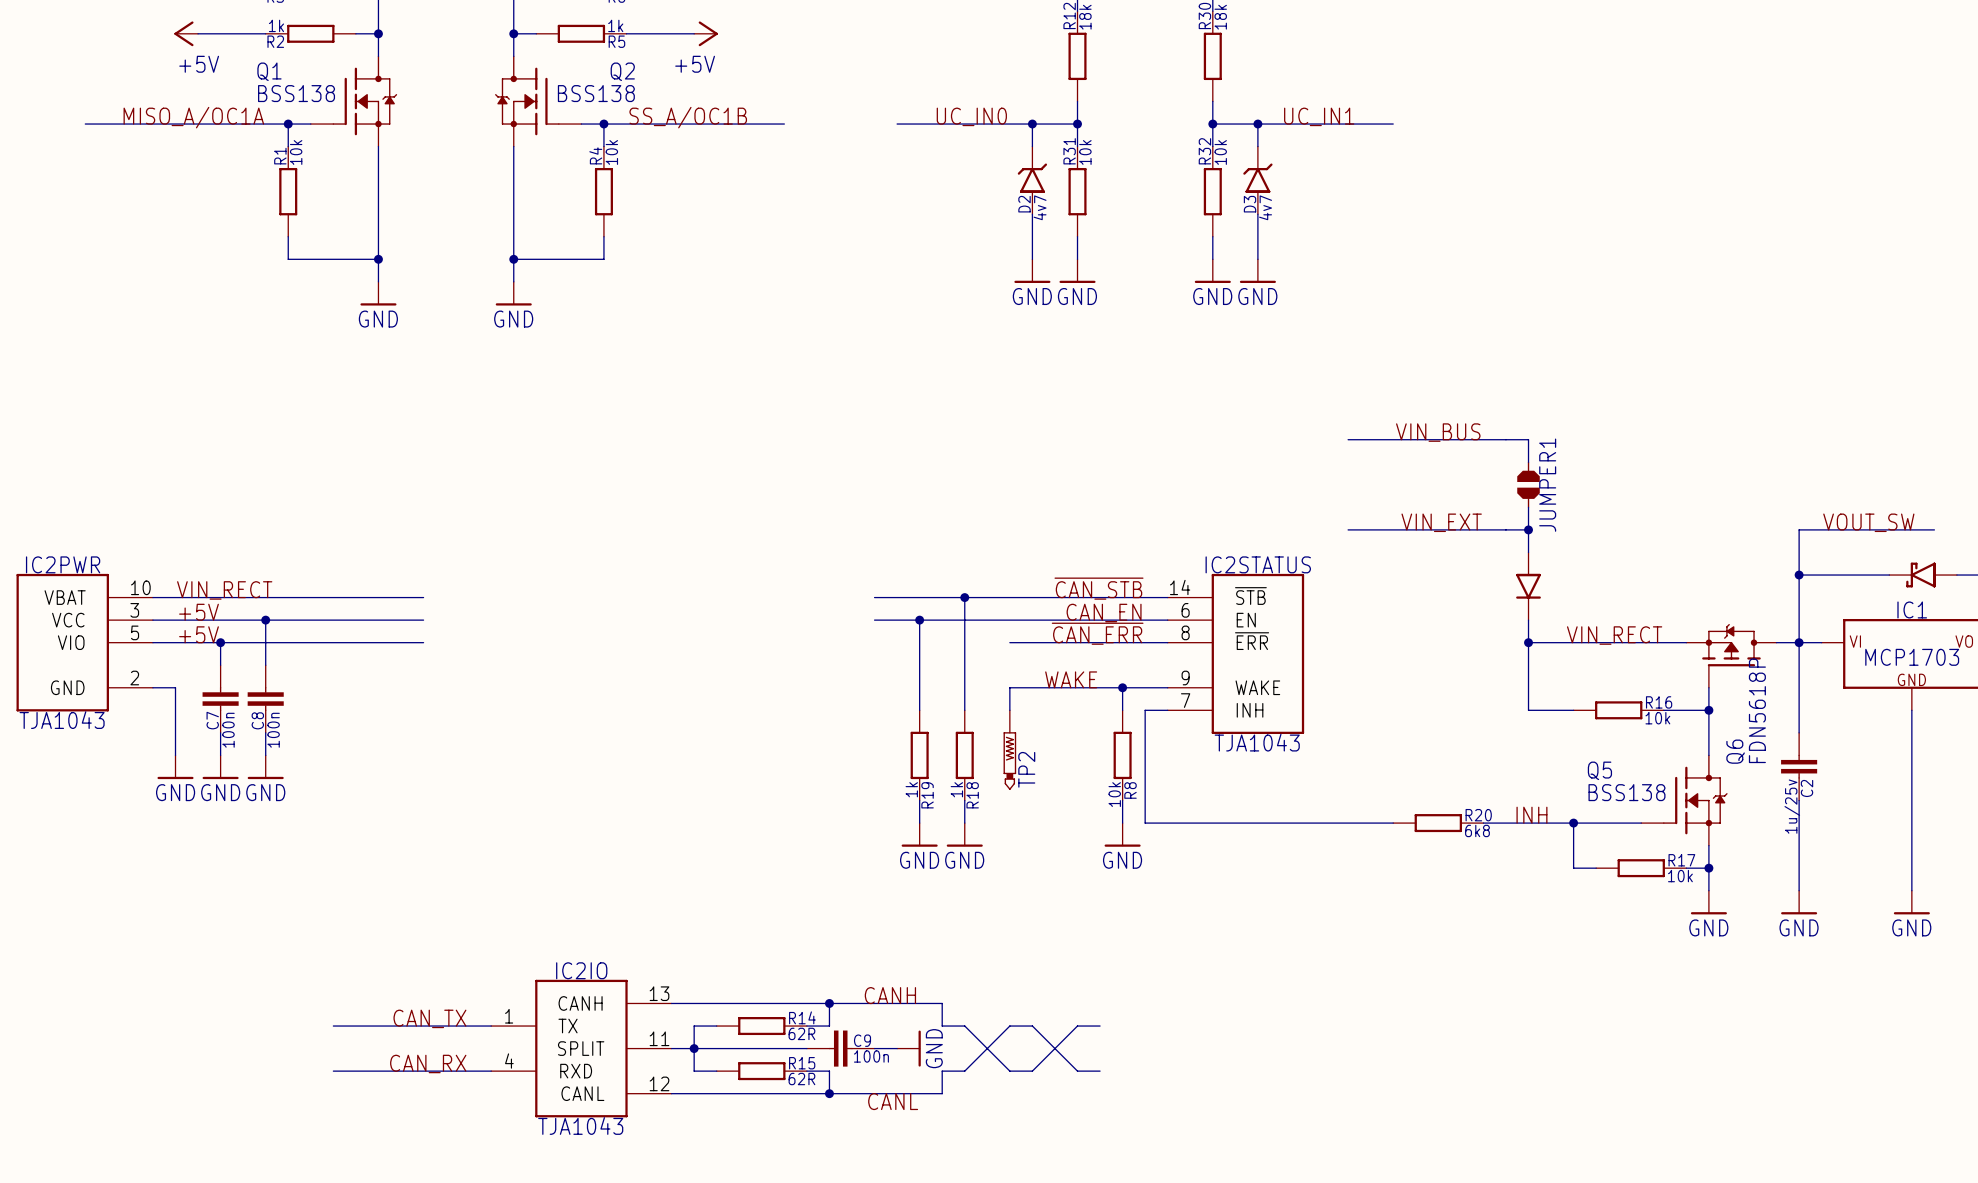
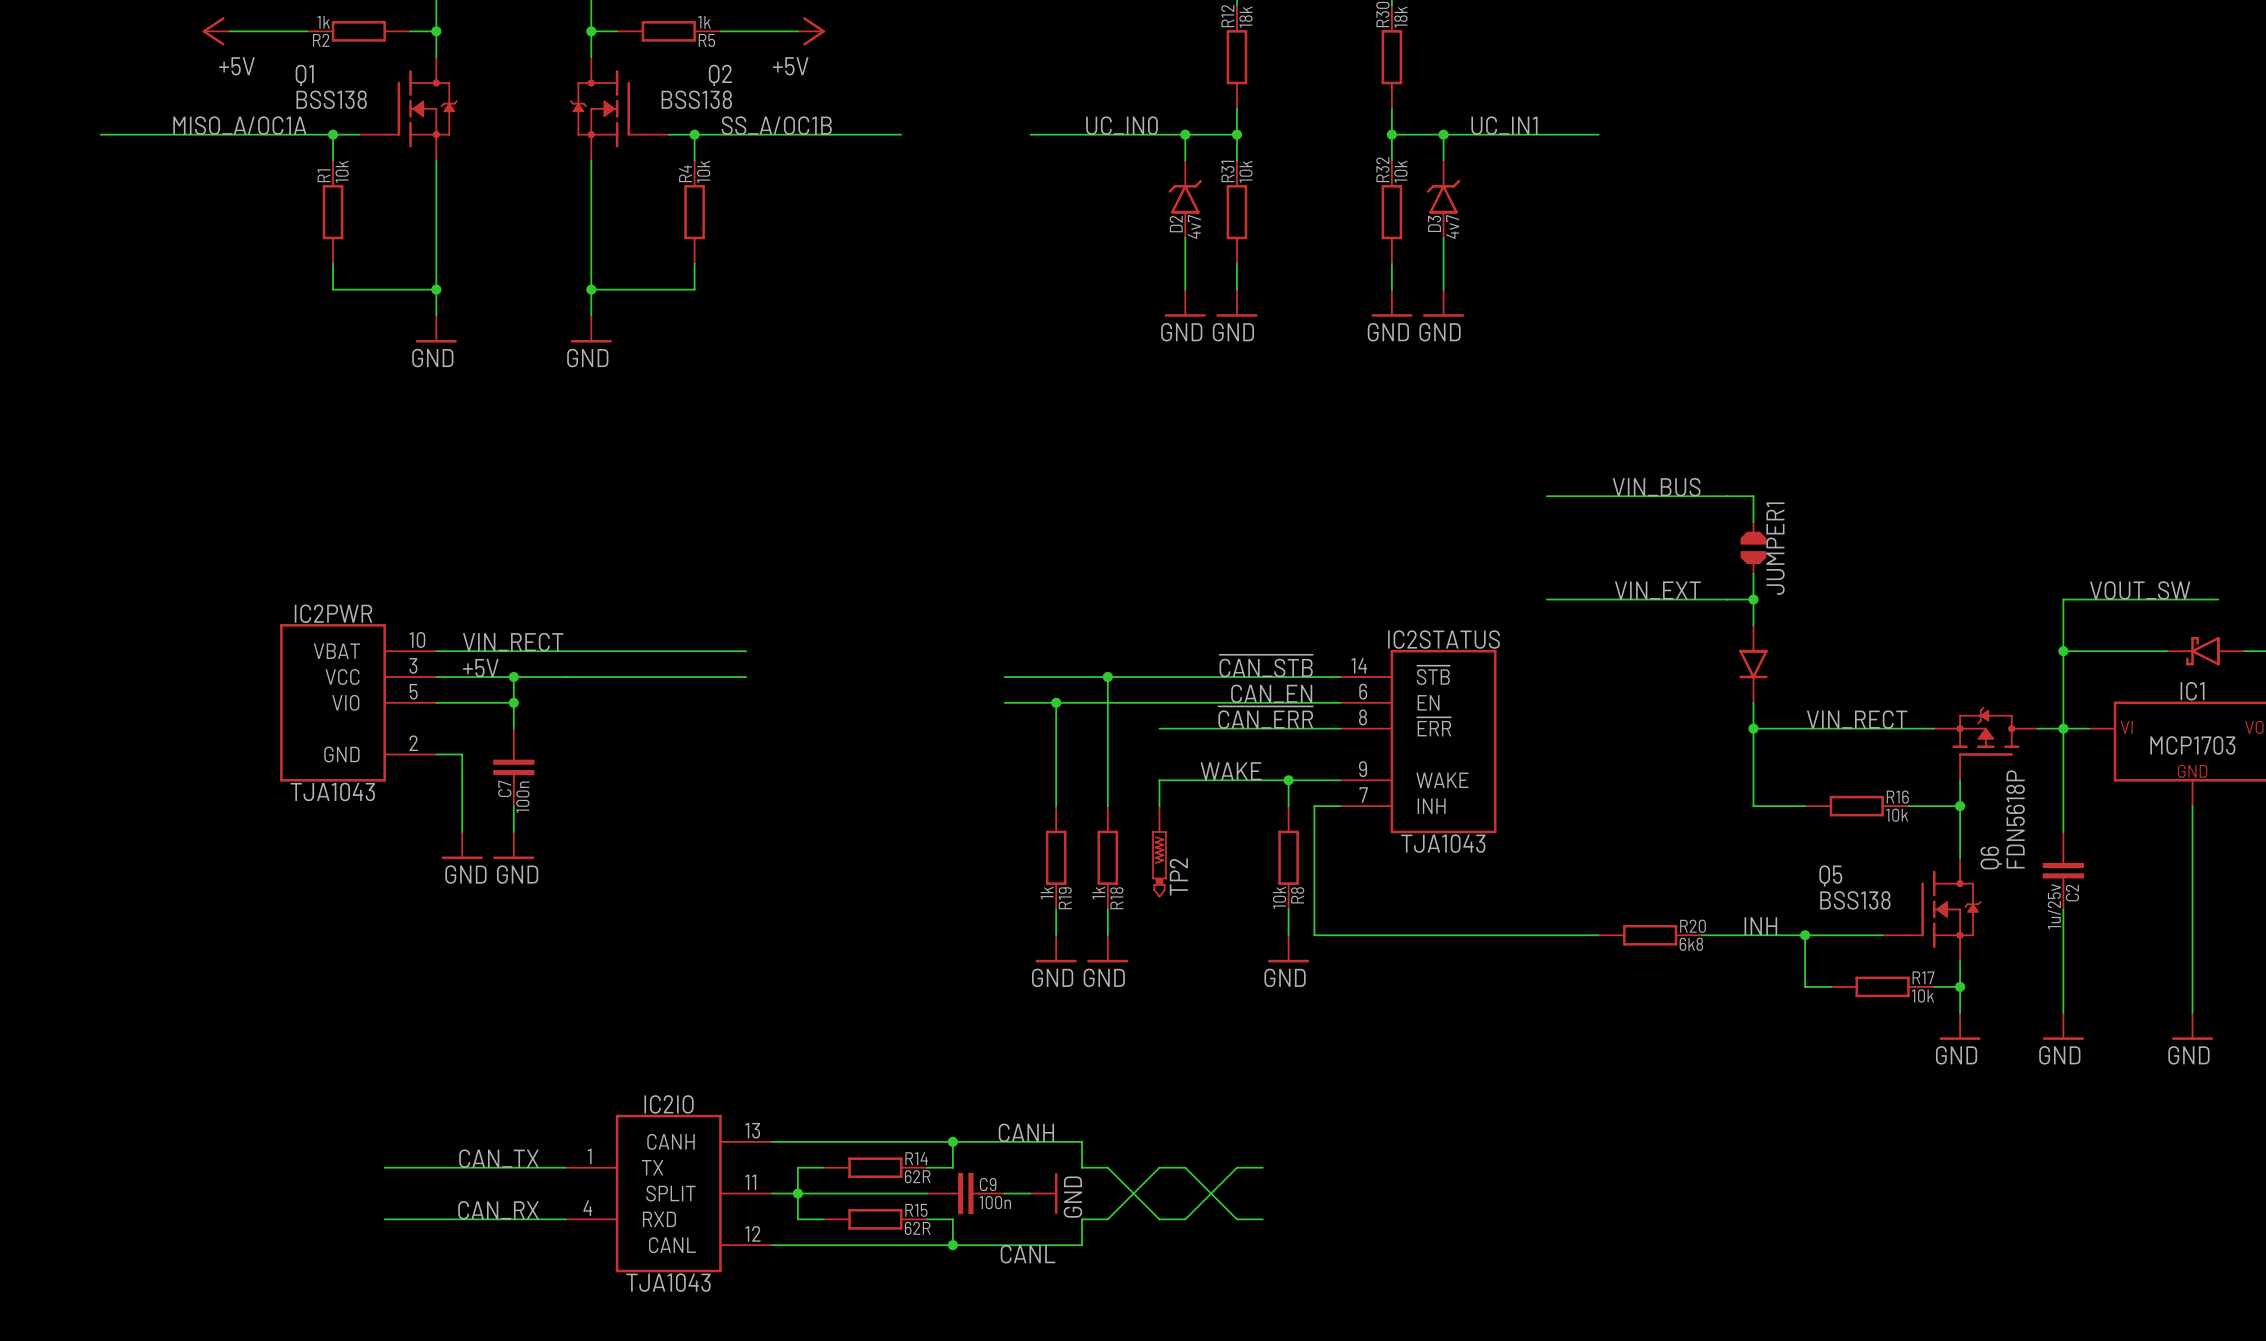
label: none -> VIN_RECT (513, 642)
wire: none -> (436, 651) (746, 651)
label: none -> +5V (480, 668)
label: VIN_RECT (224, 590) -> none
wire: (152, 597) (378, 597) -> none
wire: none -> (488, 677) (746, 677)
junction: none -> (513, 677)
label: +5V (199, 612) -> none
wire: (152, 620) (378, 620) -> none
wire: (265, 620) (265, 665) -> (513, 677) (513, 728)
junction: (265, 620) -> none
wire: none -> (488, 702) (513, 702)
junction: none -> (513, 702)
label: +5V (199, 634) -> none
IC2PWR position: (84, 642) -> (358, 702)
wire: (152, 642) (423, 642) -> none
wire: (220, 642) (220, 665) -> none
junction: (220, 642) -> none
wire: none -> (436, 754) (462, 754) (462, 831)
wire: (152, 687) (175, 687) (175, 755) -> none
C7 position: (220, 699) -> (513, 767)
C8: 100n (265, 699) -> none
wire: (220, 732) (220, 755) -> none
wire: (265, 732) (265, 755) -> (513, 806) (513, 831)
power symbol: none -> GND (462, 845)
power symbol: none -> GND (513, 845)
power symbol: GND (175, 767) -> none
power symbol: GND (220, 767) -> none
power symbol: GND (265, 767) -> none

